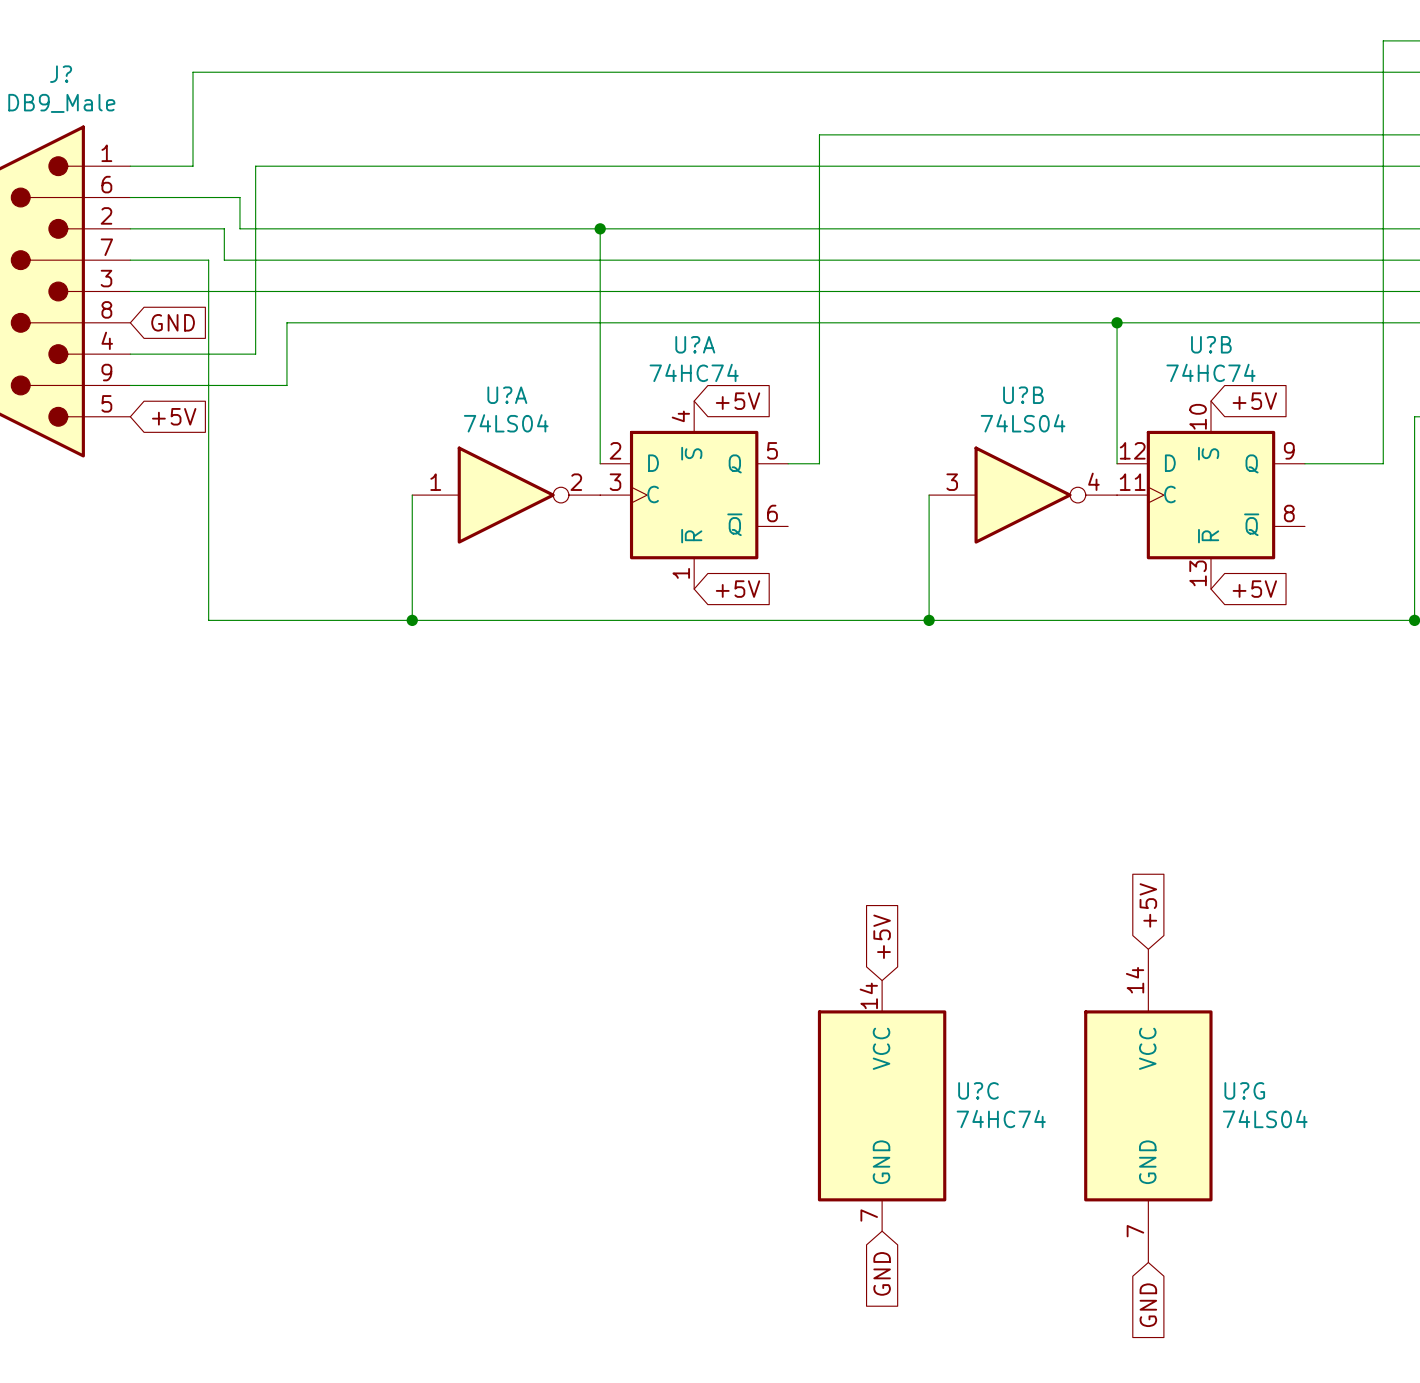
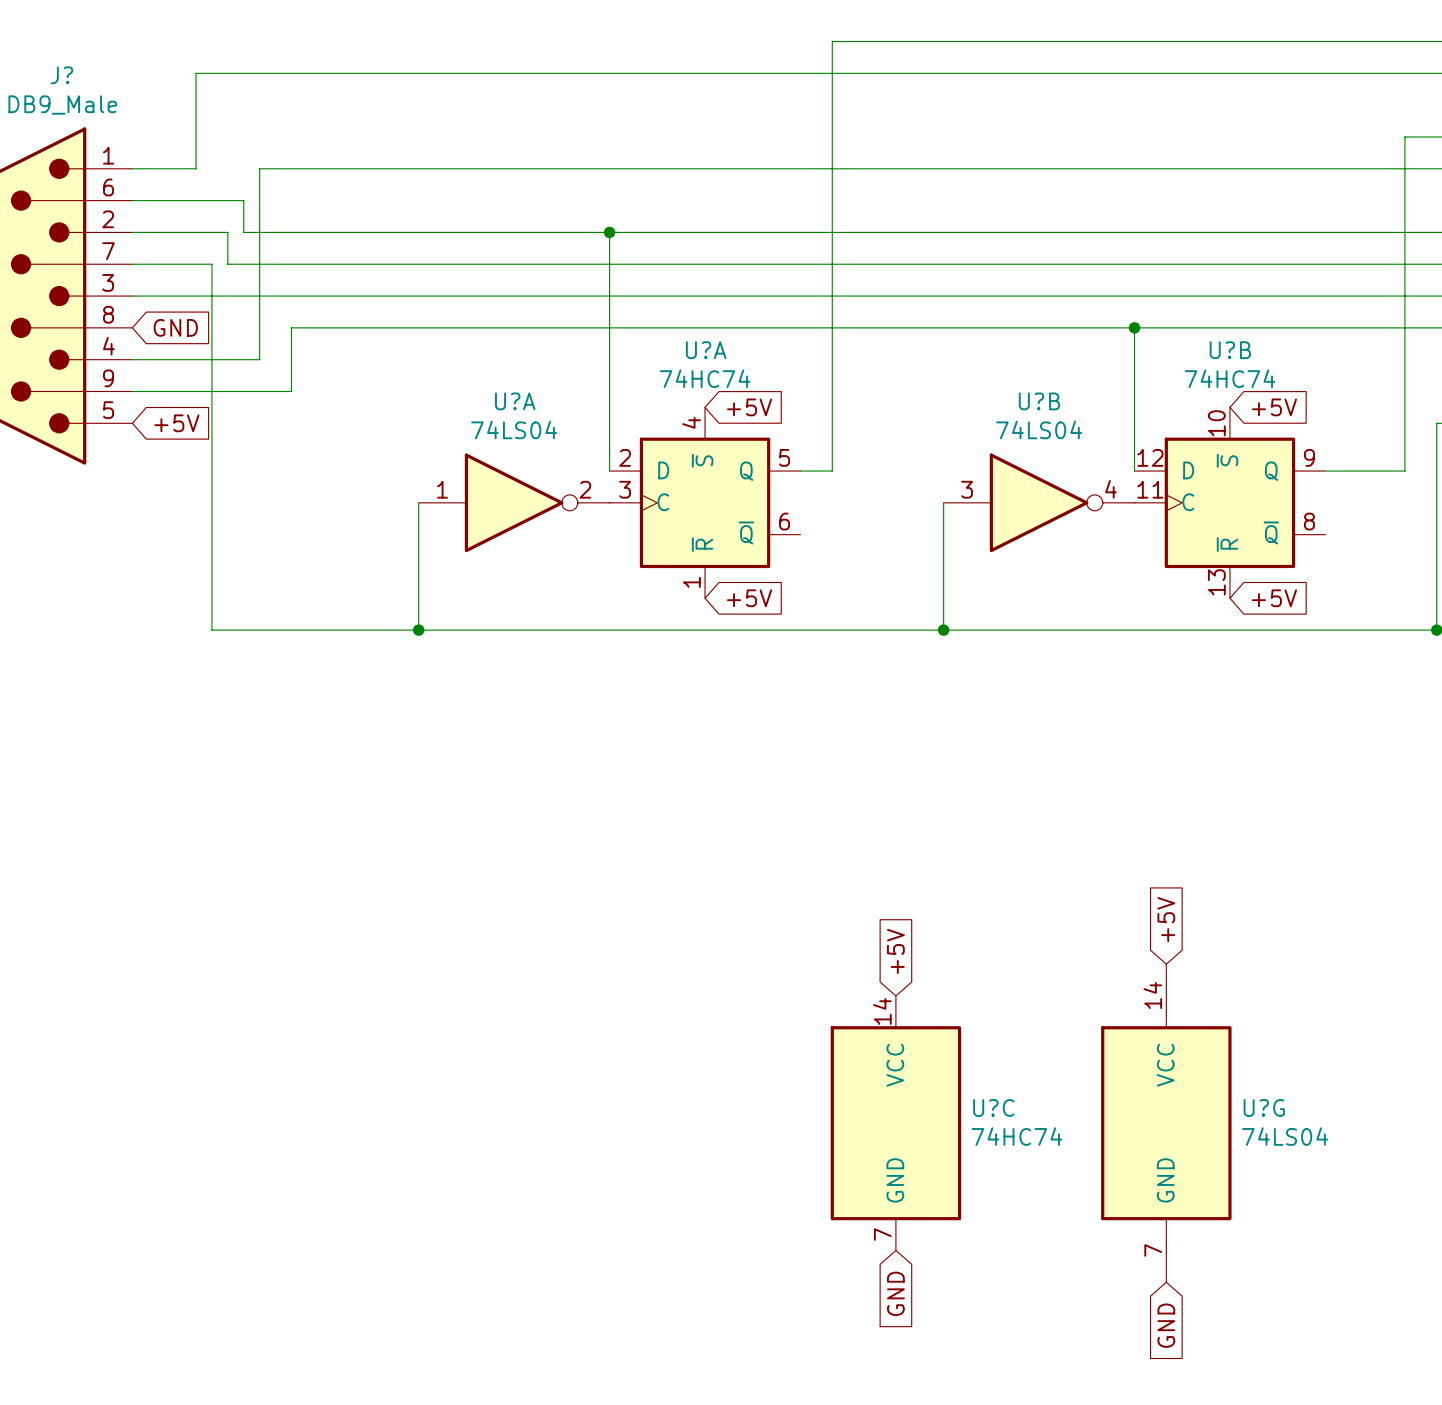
wire: (1383, 40) (1383, 134) (819, 134) -> (1404, 41) (832, 41) (832, 136)

